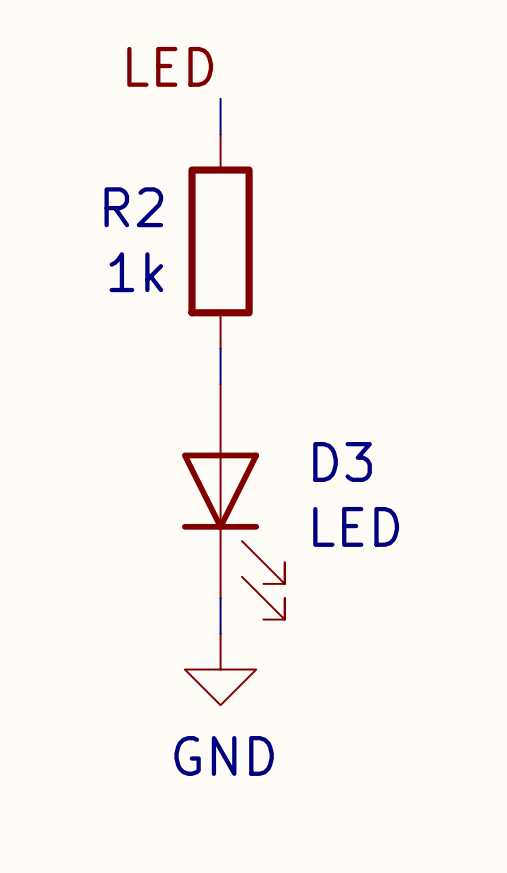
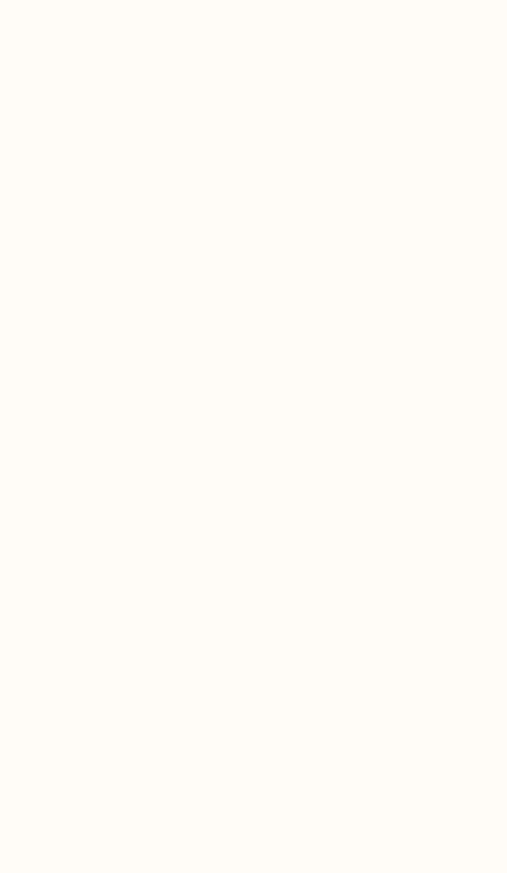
label: LED (170, 66) -> none
wire: (220, 98) (220, 134) -> none
R2: 1k (220, 241) -> none
wire: (220, 348) (220, 384) -> none
D3: LED (233, 501) -> none
wire: (220, 598) (220, 633) -> none
power symbol: GND (220, 669) -> none

